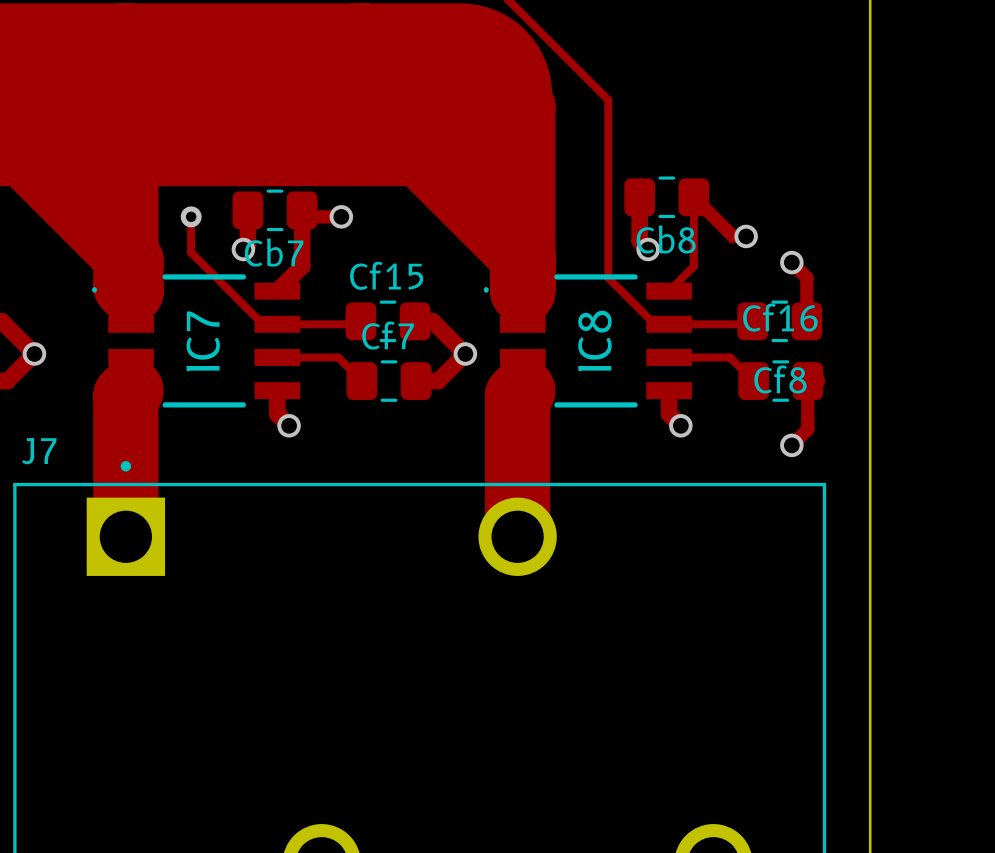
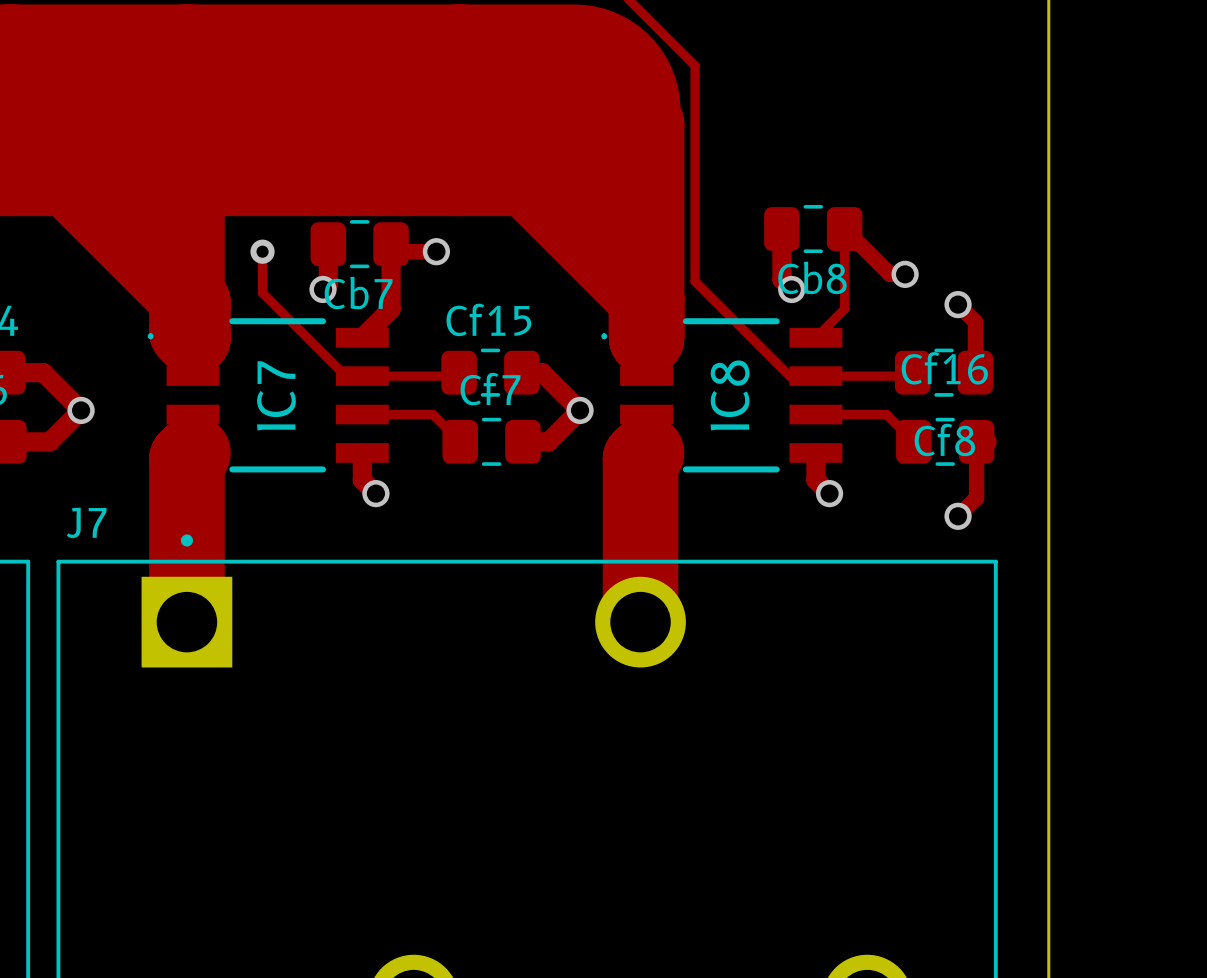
track: (564, 56) (608, 99) (608, 277) (654, 324) -> (695, 65) (695, 281) (789, 376) (799, 376)

